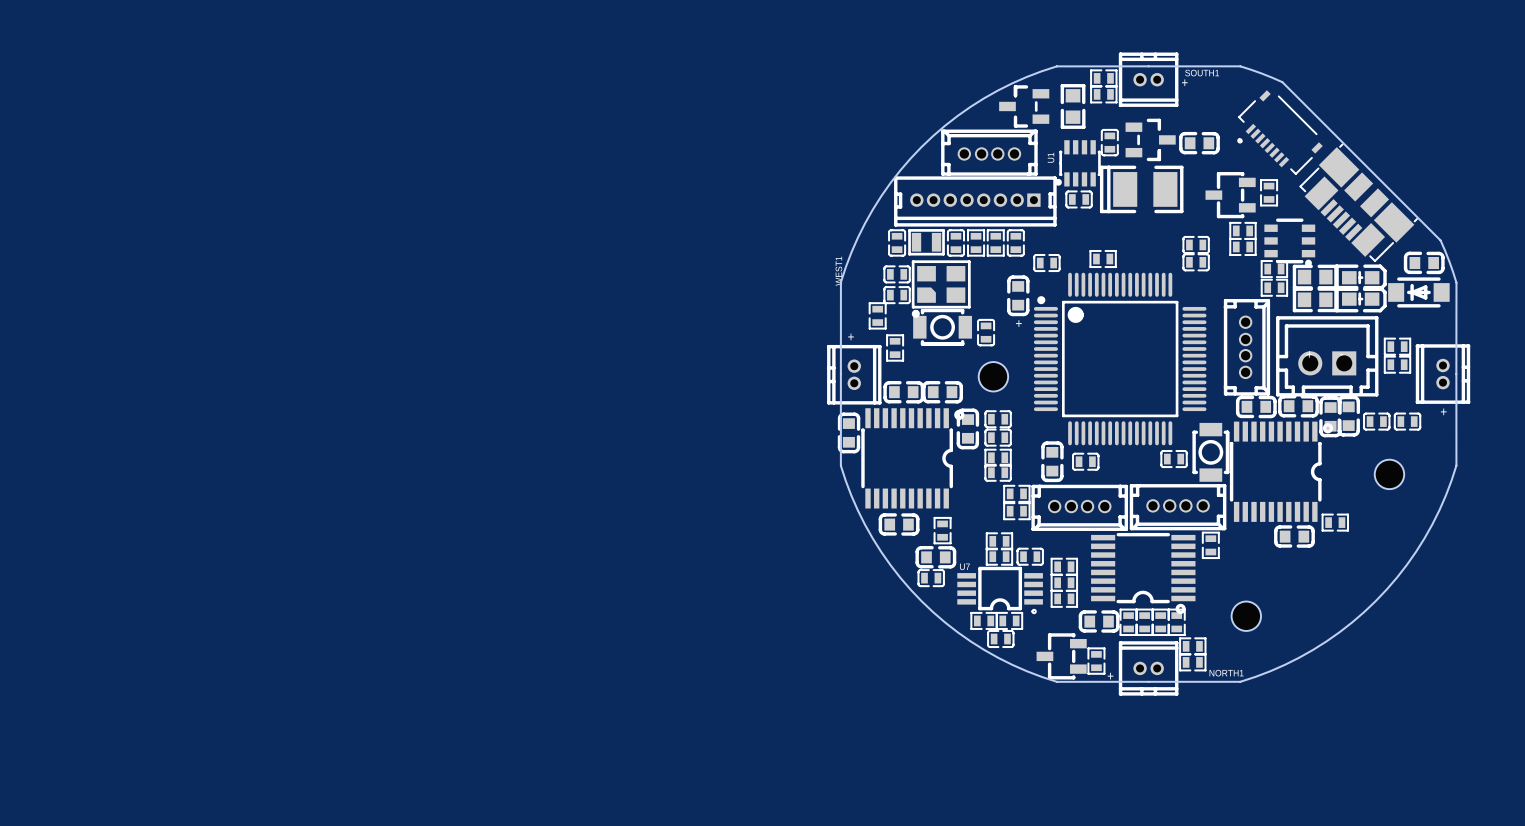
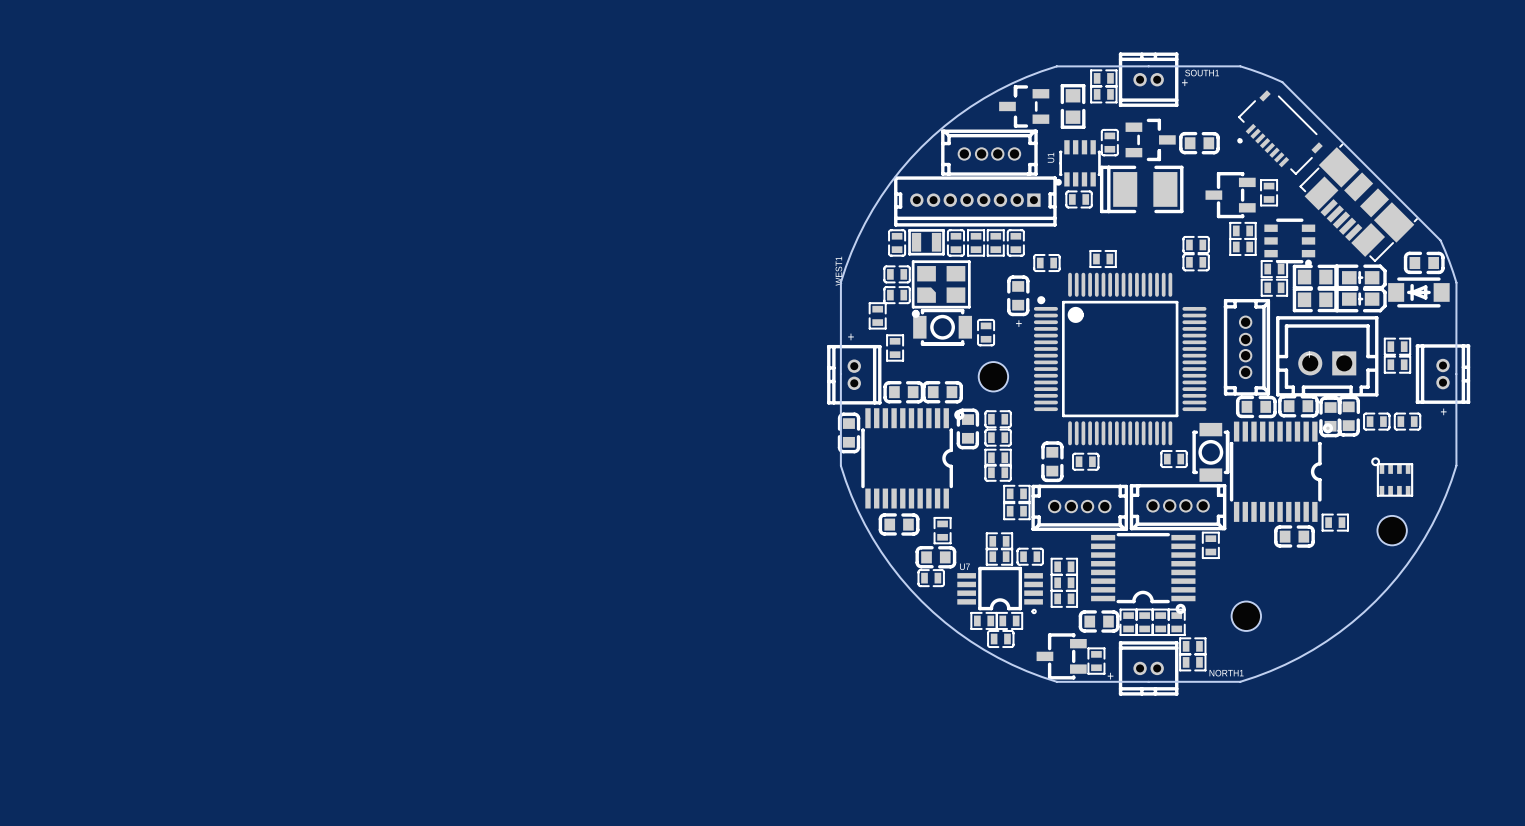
part footprint: [1374, 459, 1405, 490] -> [1371, 457, 1414, 497]
part: none -> (1392, 530)

